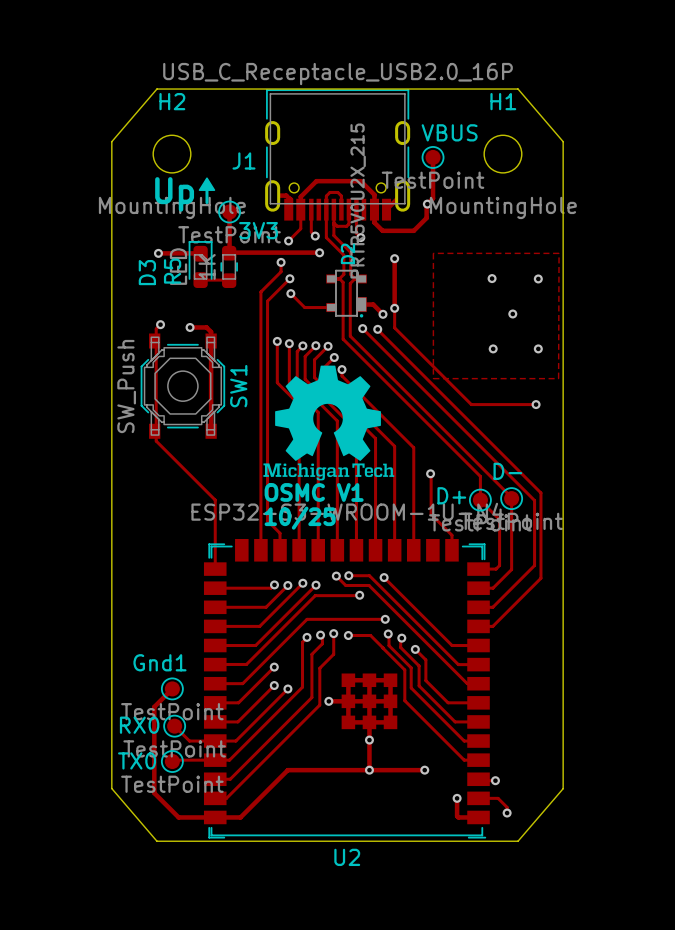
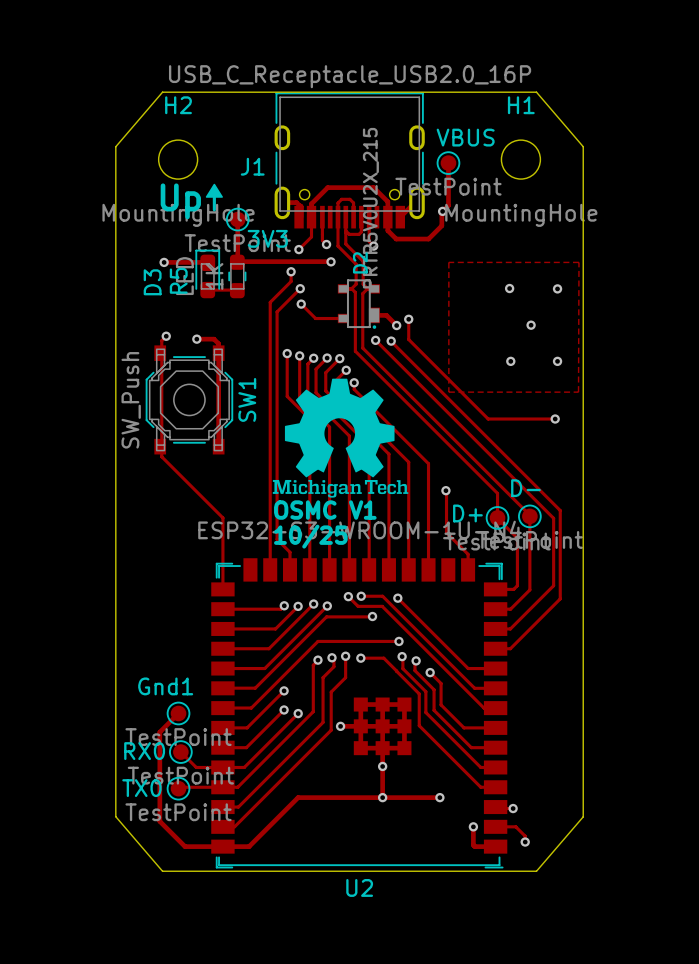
track: (394, 258) (394, 308) -> none
via: (394, 258) -> none

